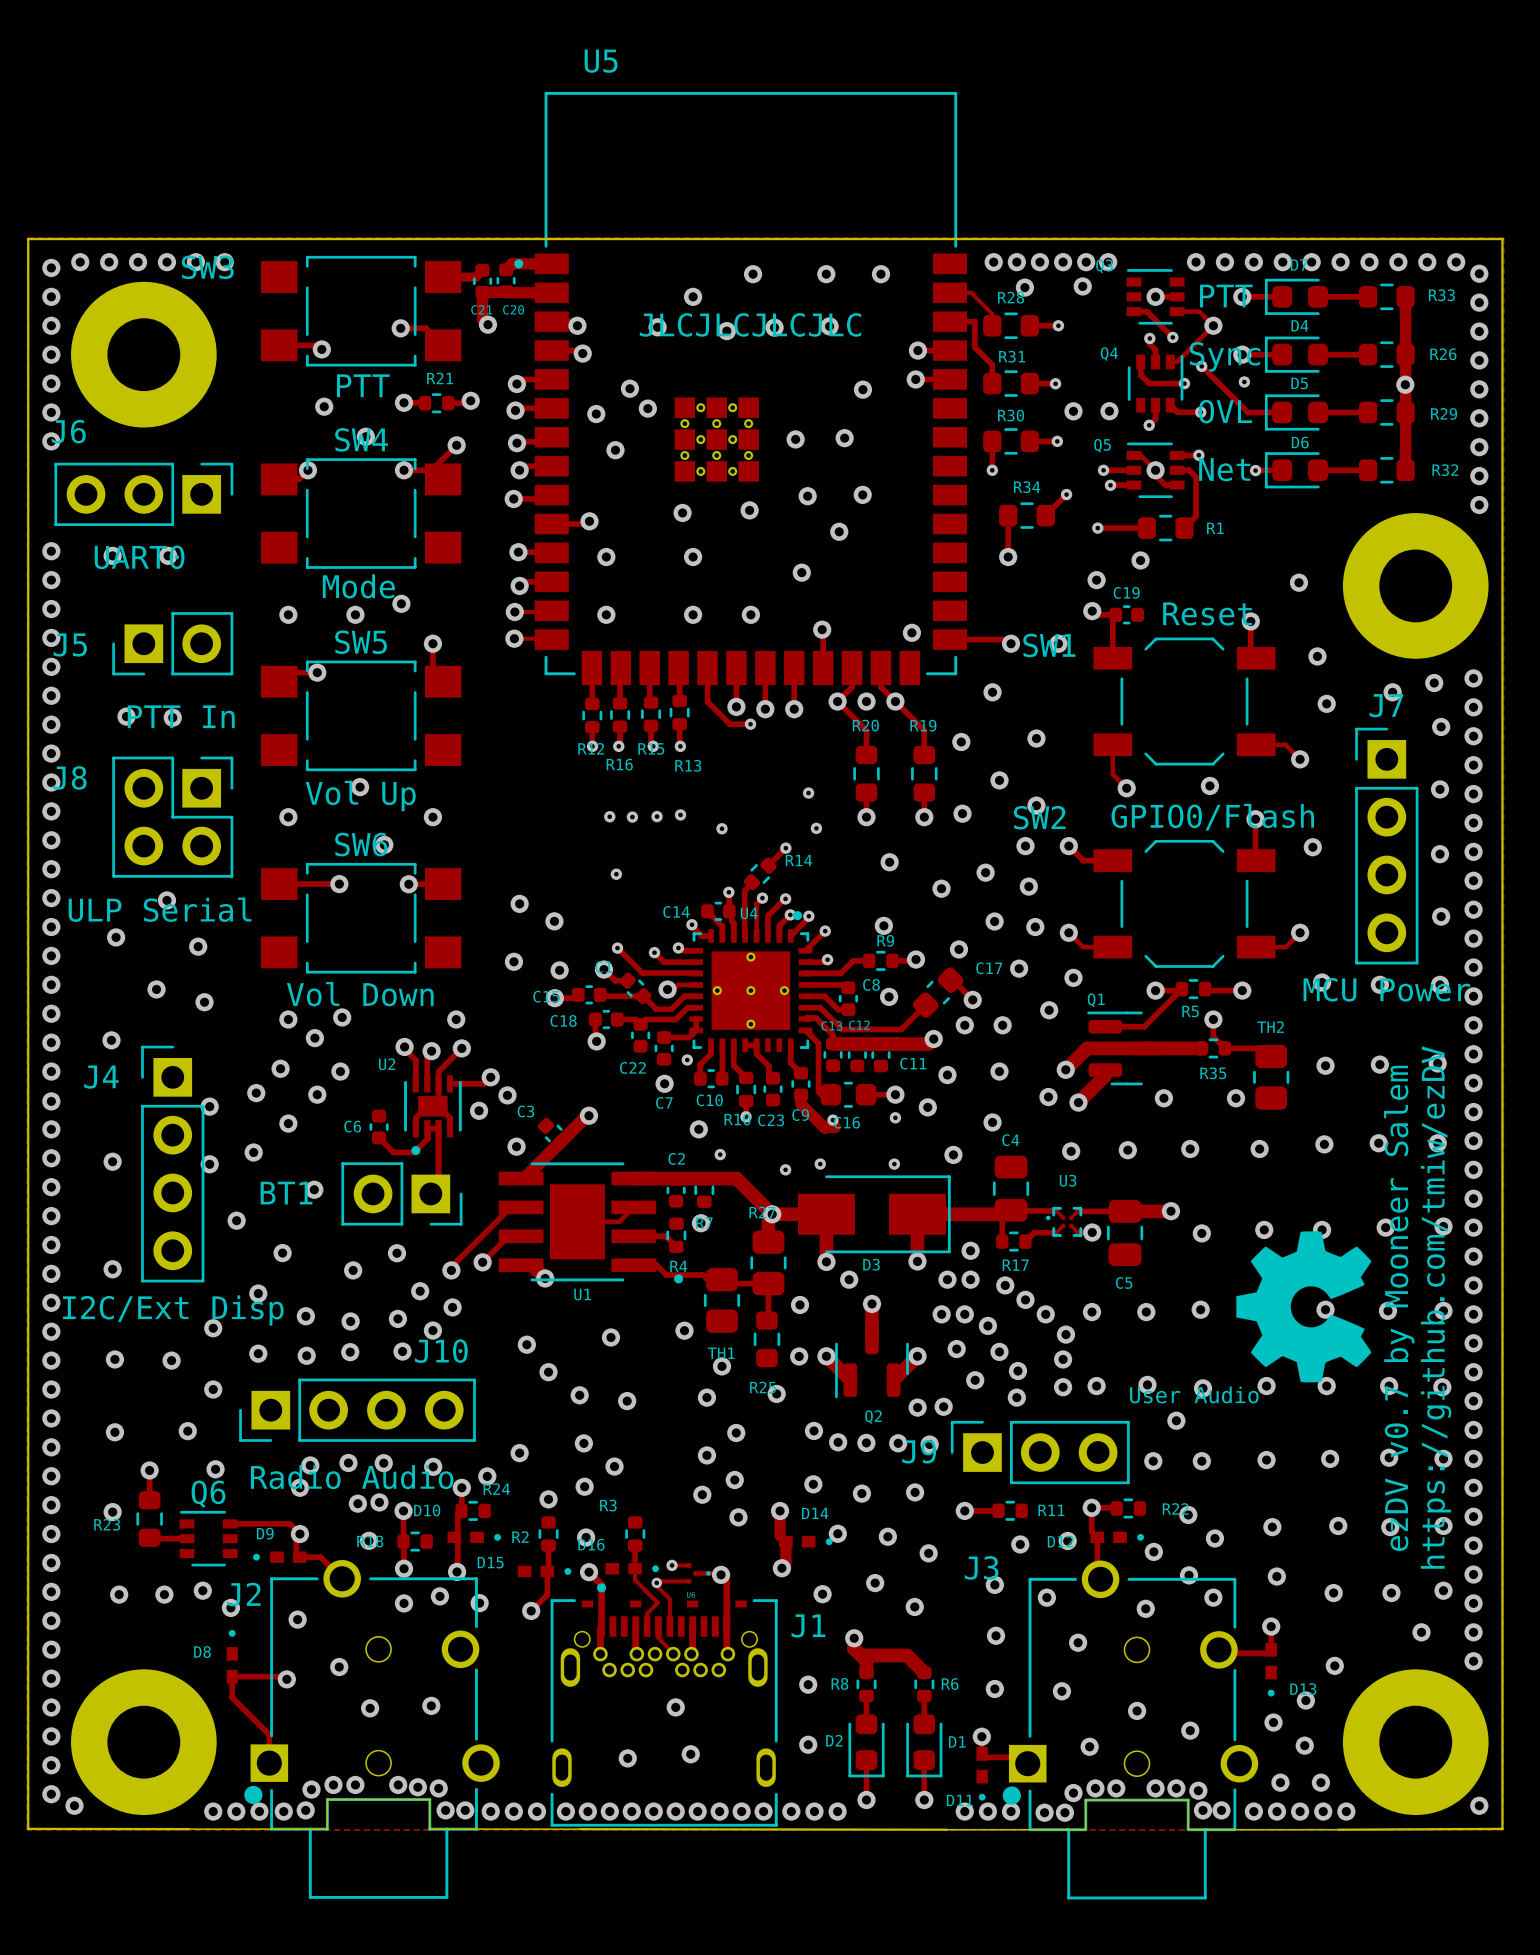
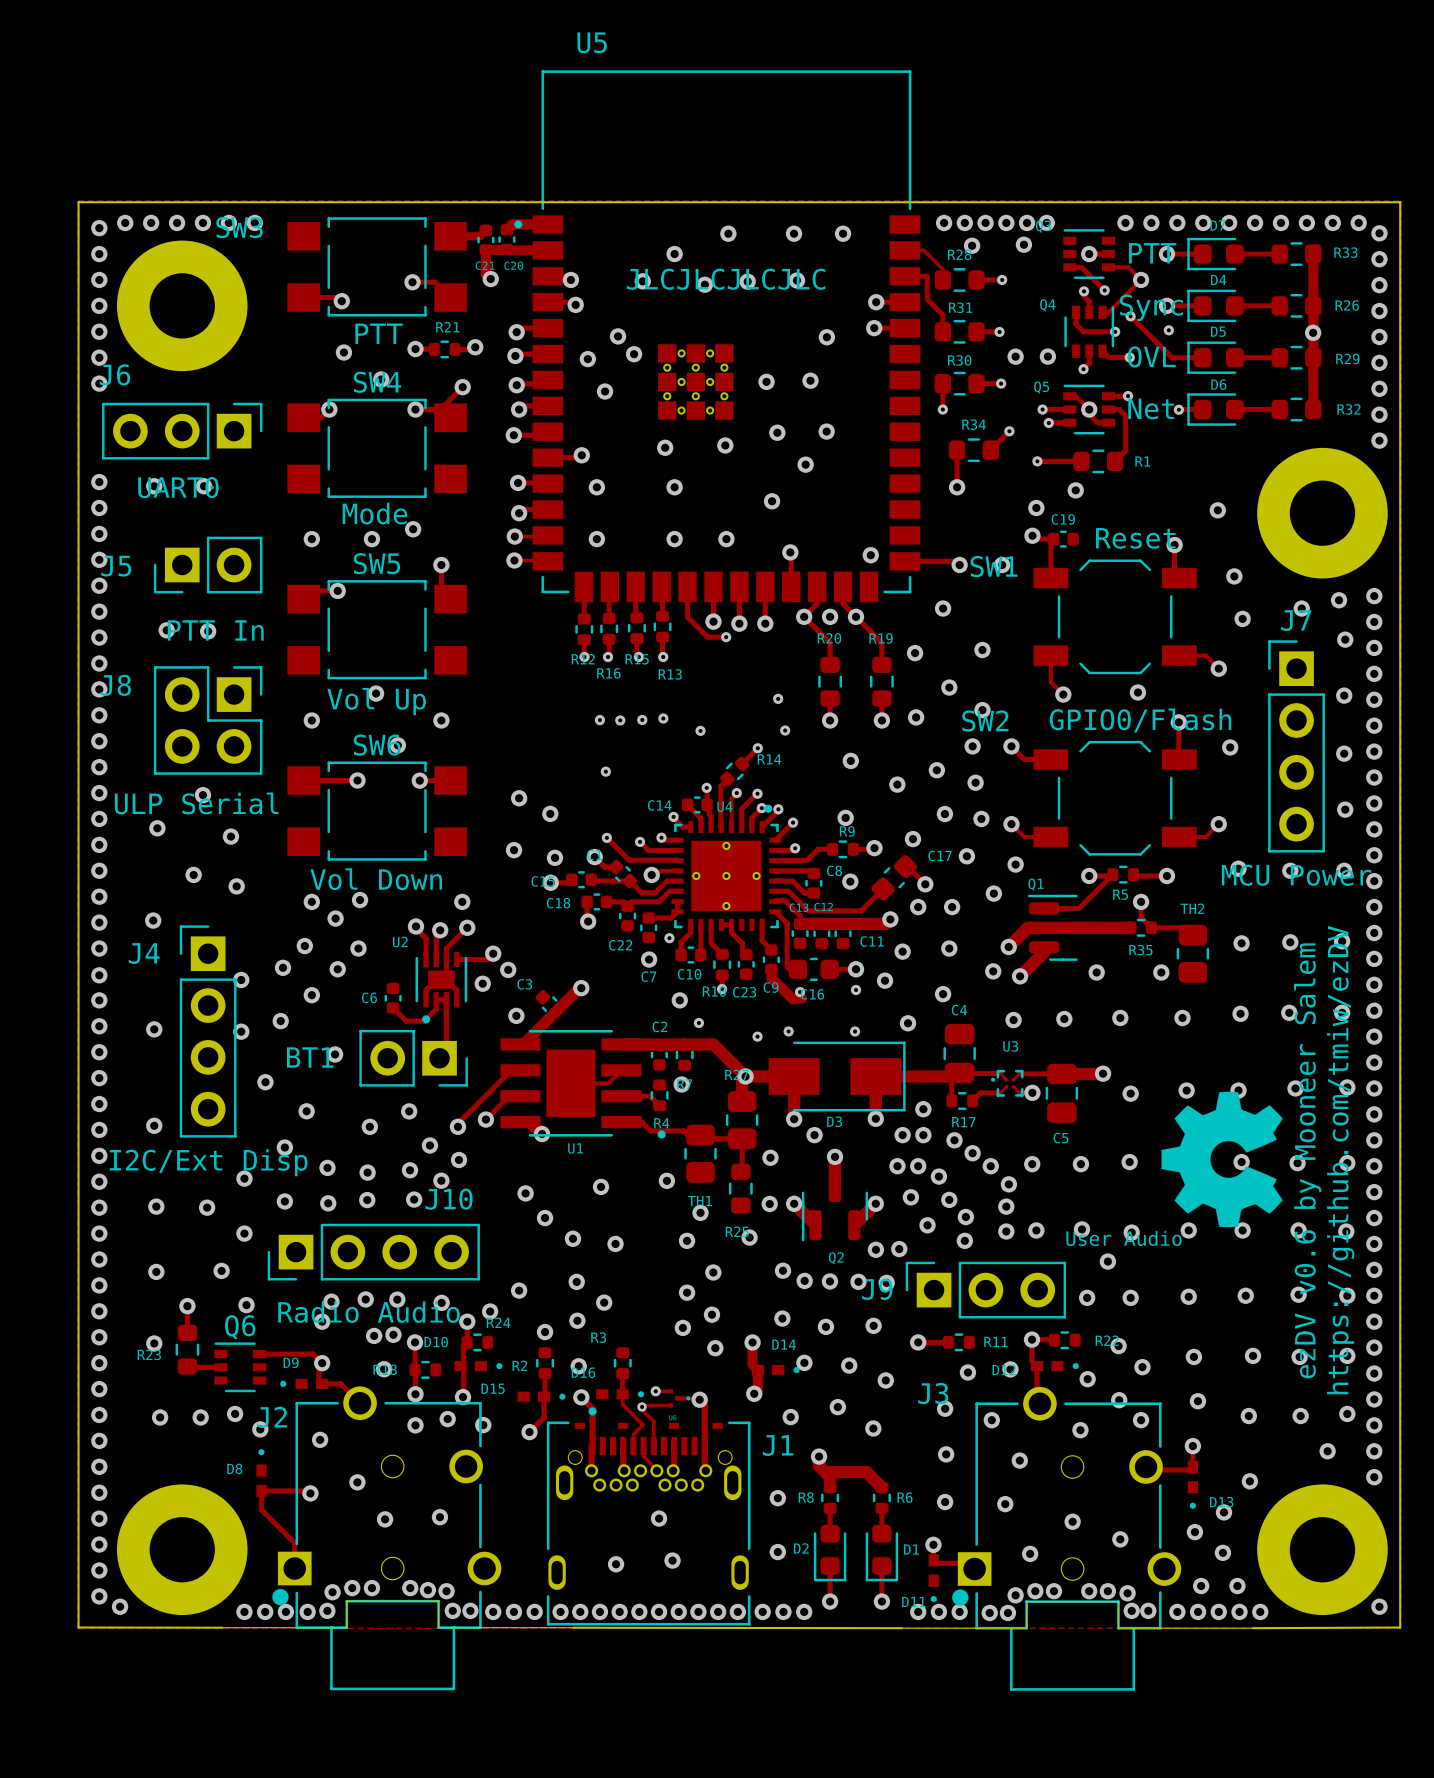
text: ezDV v0.7 by Mooneer Salem (1399, 1308) -> ezDV v0.6 by Mooneer Salem (1307, 1160)

